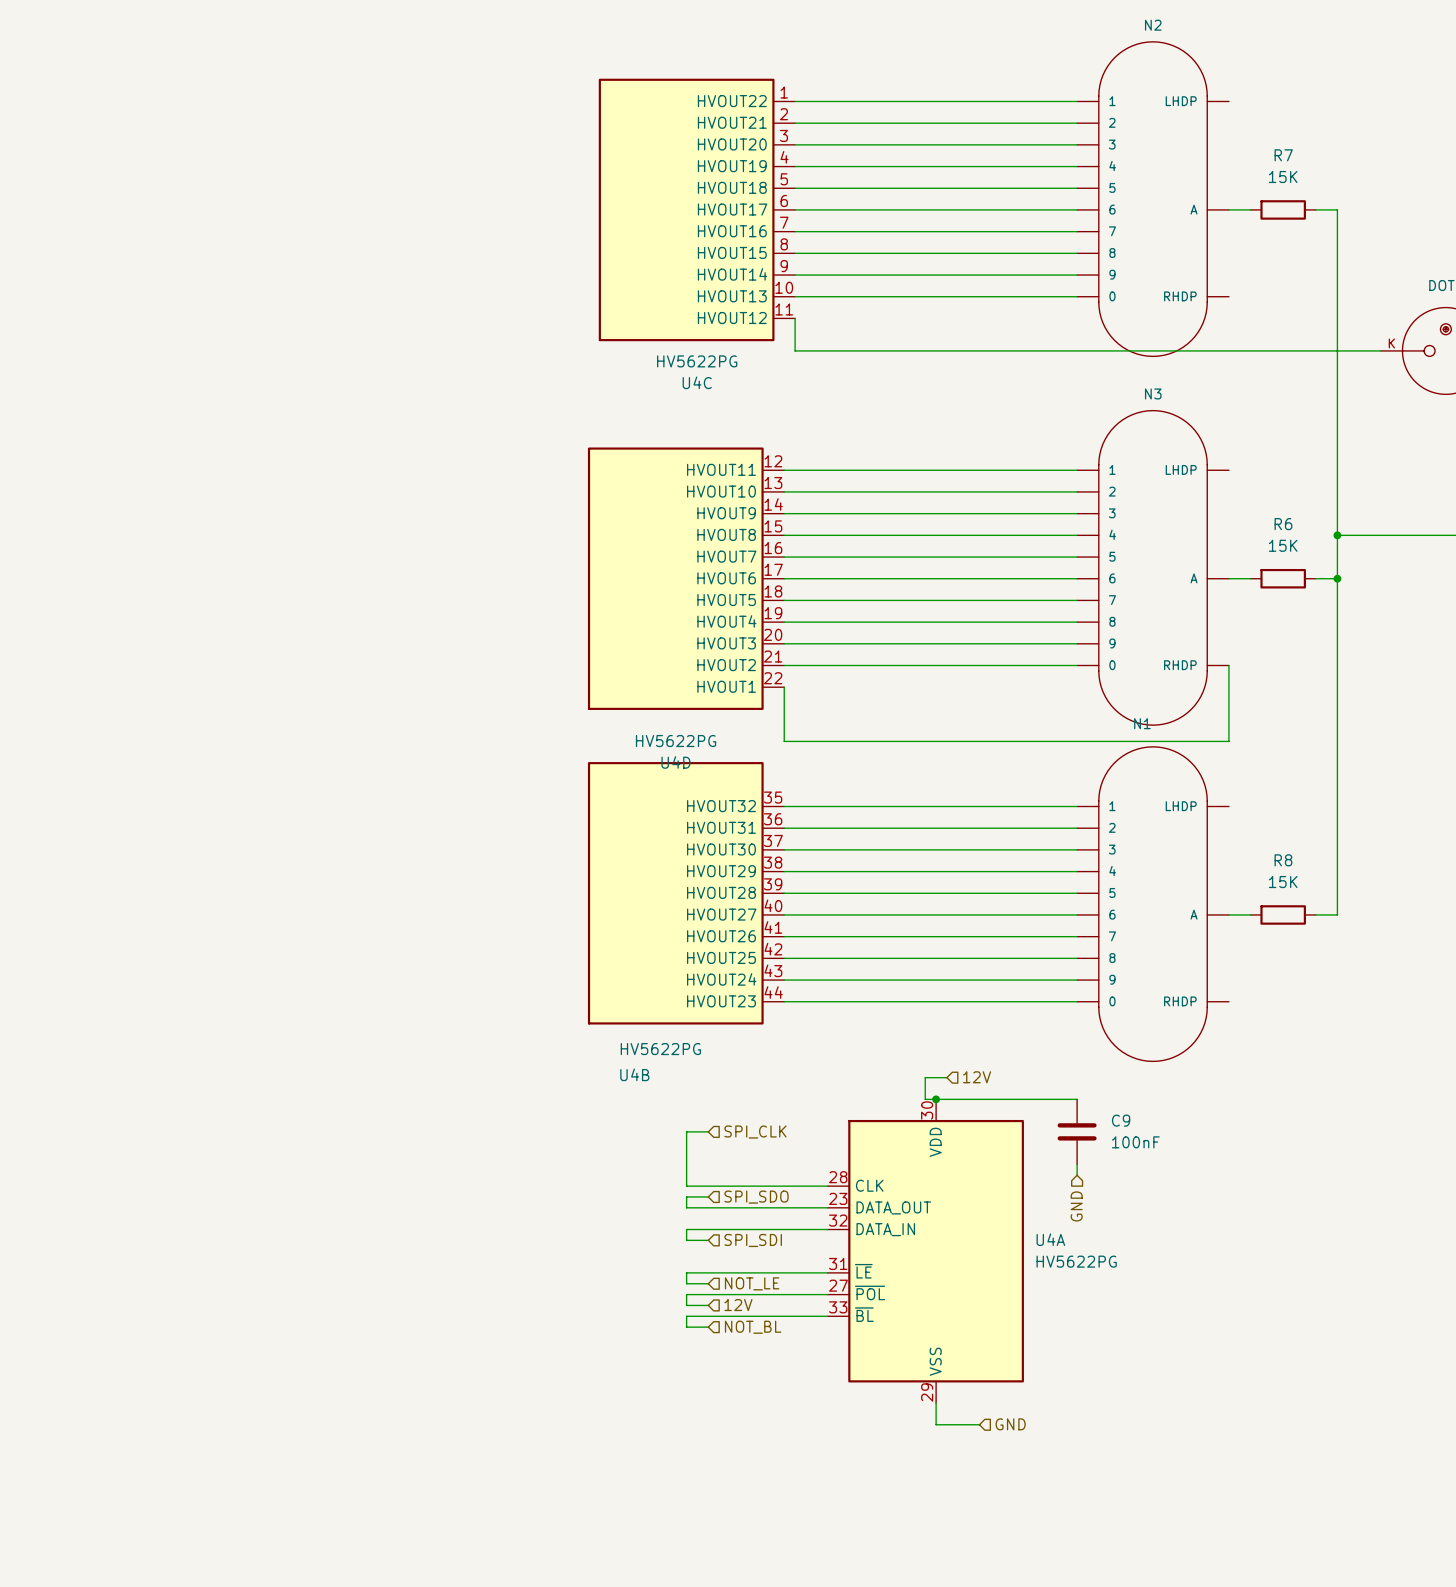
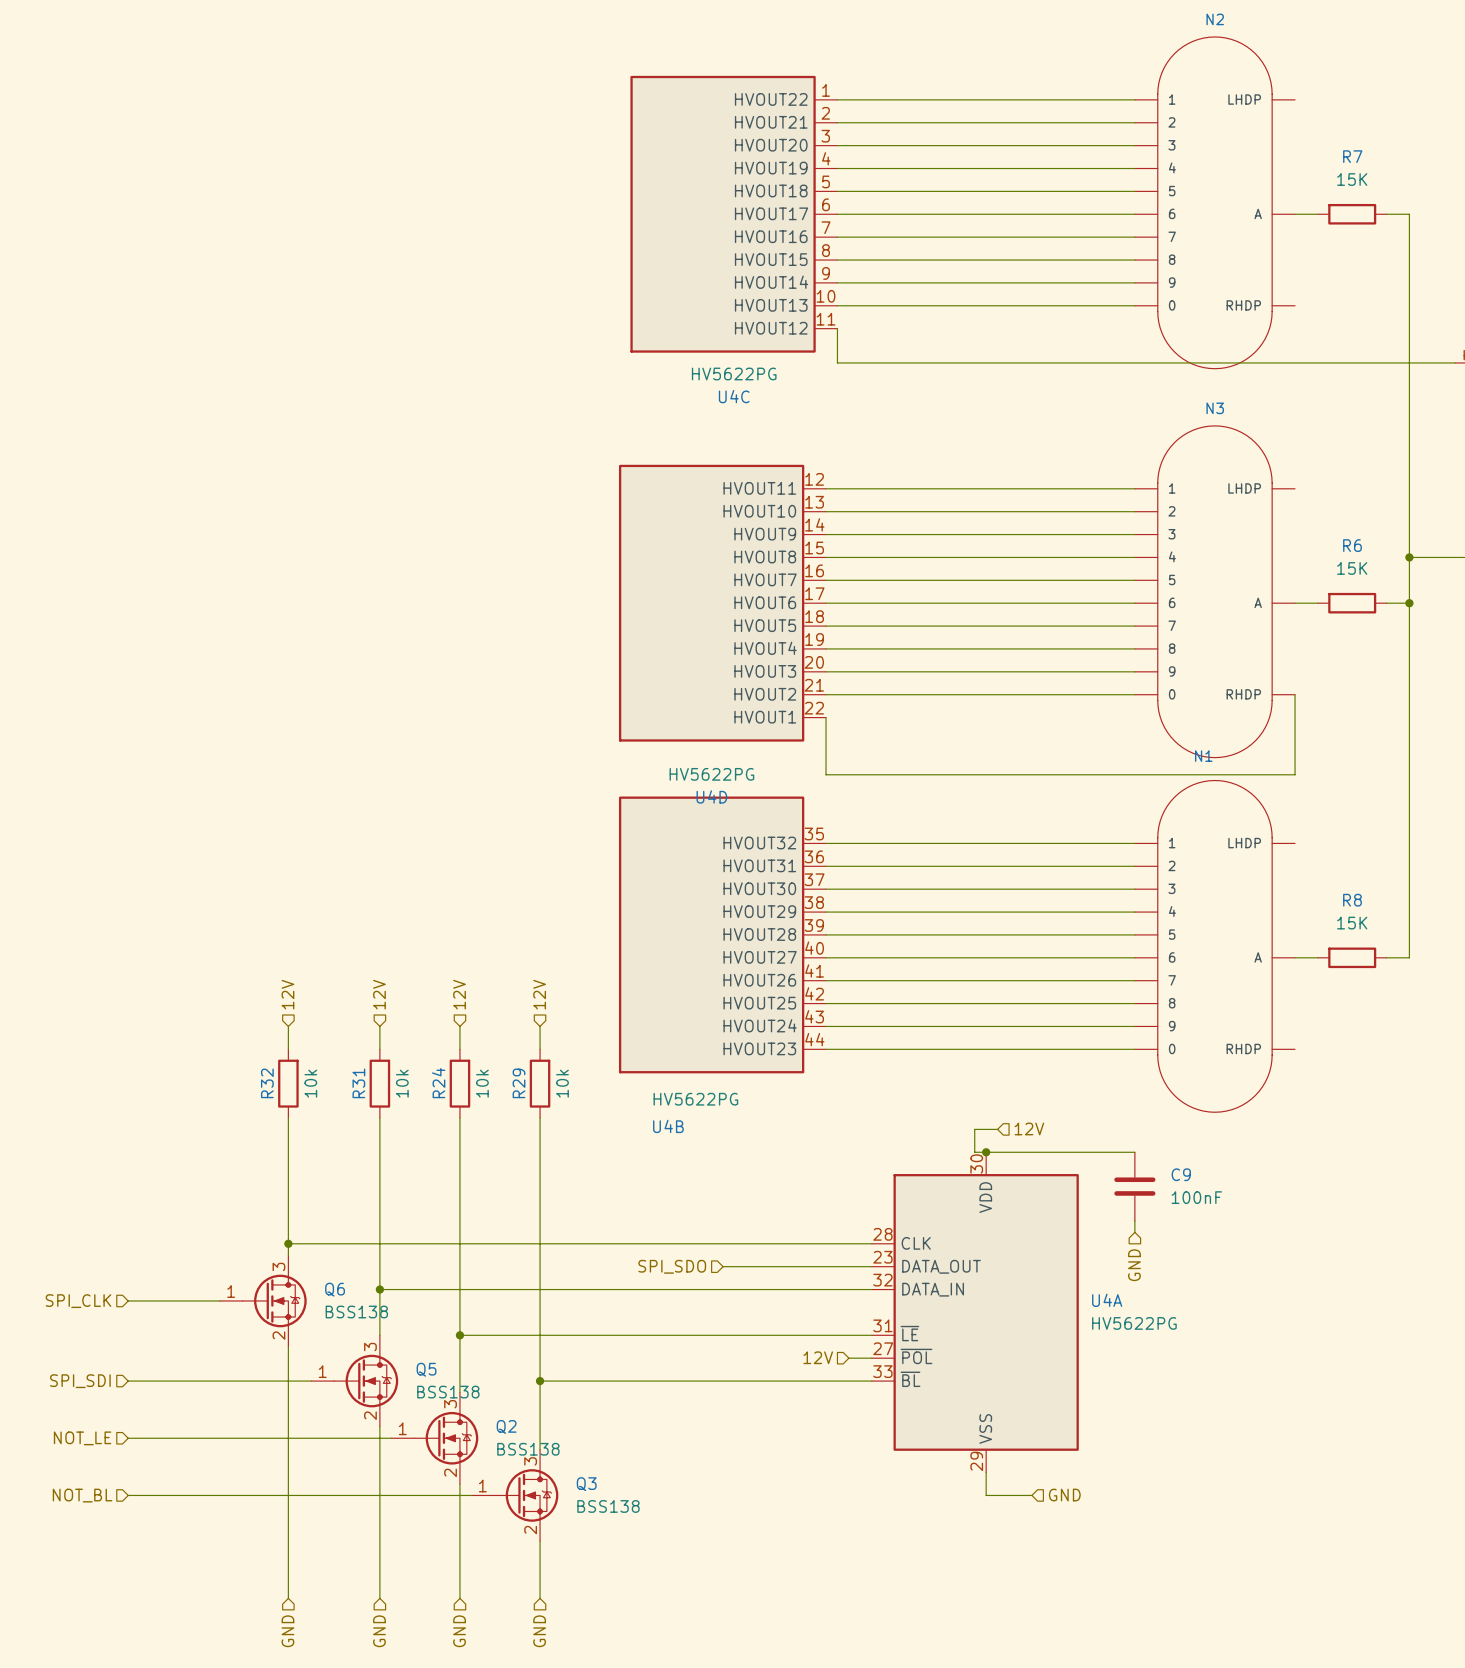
hierarchical label: none -> 12V (287, 994)
hierarchical label: none -> 12V (379, 994)
hierarchical label: none -> 12V (459, 994)
hierarchical label: none -> 12V (539, 994)
wire: none -> (288, 1026) (288, 1049)
wire: none -> (379, 1026) (379, 1049)
wire: none -> (459, 1026) (459, 1049)
wire: none -> (540, 1026) (540, 1049)
R32: none -> 10k (288, 1083)
R31: none -> 10k (379, 1083)
R24: none -> 10k (459, 1083)
R29: none -> 10k (540, 1083)
wire: none -> (288, 1117) (288, 1255)
wire: none -> (379, 1117) (379, 1335)
wire: none -> (459, 1117) (459, 1392)
wire: none -> (540, 1117) (540, 1449)
wire: (708, 1131) (686, 1131) (686, 1186) -> (288, 1243) (723, 1243)
hierarchical label: SPI_CLK (755, 1132) -> none
junction: none -> (288, 1243)
wire: (708, 1196) (686, 1196) (686, 1207) -> none
hierarchical label rotation: 0° (756, 1197) -> 180° (672, 1266)
hierarchical label position: SPI_SDO (756, 1197) -> SPI_SDO (672, 1266)
junction: none -> (379, 1289)
wire: (686, 1229) (686, 1240) (708, 1240) -> (723, 1289) (379, 1289)
hierarchical label: none -> SPI_CLK (78, 1301)
wire: none -> (128, 1300) (219, 1300)
Q6: none -> BSS138 (263, 1300)
hierarchical label: SPI_SDI (753, 1240) -> none
junction: none -> (459, 1335)
wire: (686, 1272) (686, 1283) (708, 1283) -> (723, 1335) (459, 1335)
wire: none -> (288, 1346) (288, 1598)
hierarchical label: NOT_LE (752, 1283) -> none
wire: (805, 1294) (686, 1294) (686, 1305) (708, 1305) -> none
hierarchical label rotation: 0° (738, 1305) -> 180° (818, 1357)
hierarchical label: none -> SPI_SDI (80, 1381)
wire: none -> (128, 1381) (311, 1381)
Q5: none -> BSS138 (354, 1381)
junction: none -> (540, 1381)
wire: (686, 1316) (686, 1327) (708, 1327) -> (723, 1381) (540, 1381)
hierarchical label: NOT_BL (753, 1327) -> none
wire: none -> (379, 1426) (379, 1598)
hierarchical label: none -> NOT_LE (82, 1438)
wire: none -> (128, 1438) (391, 1438)
Q2: none -> BSS138 (434, 1438)
wire: none -> (459, 1484) (459, 1598)
hierarchical label: none -> NOT_BL (82, 1495)
wire: none -> (128, 1495) (471, 1495)
Q3: none -> BSS138 (514, 1495)
wire: none -> (540, 1541) (540, 1598)
hierarchical label: none -> GND (287, 1631)
hierarchical label: none -> GND (379, 1631)
hierarchical label: none -> GND (459, 1631)
hierarchical label: none -> GND (539, 1631)

